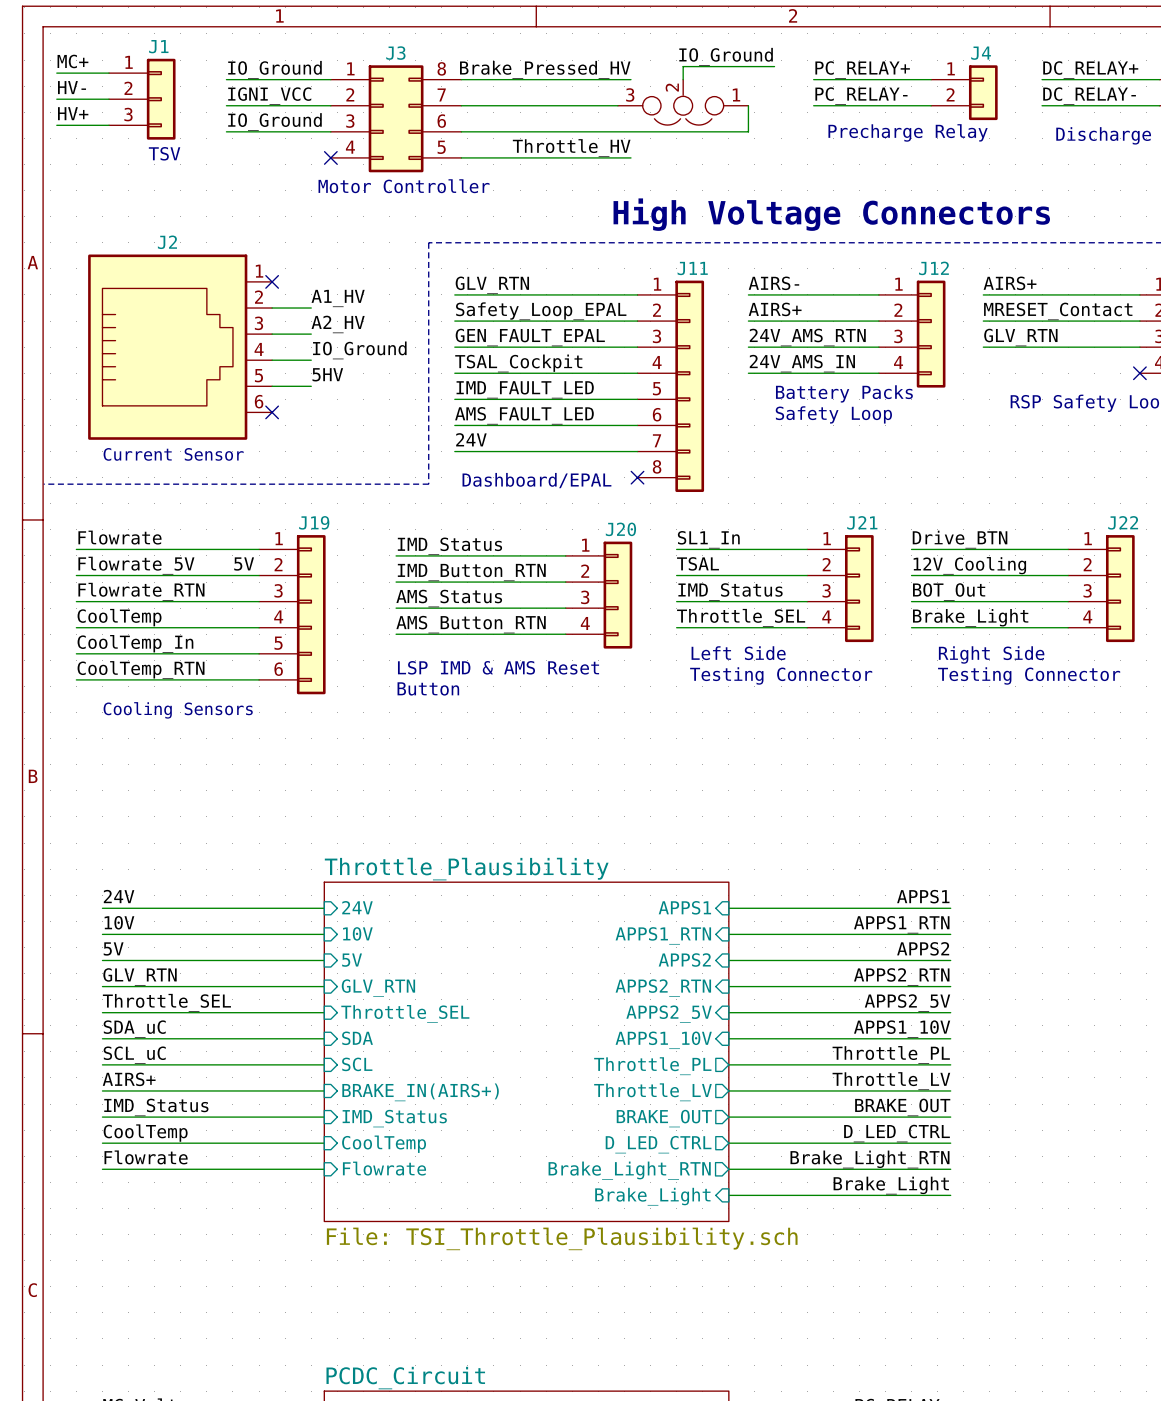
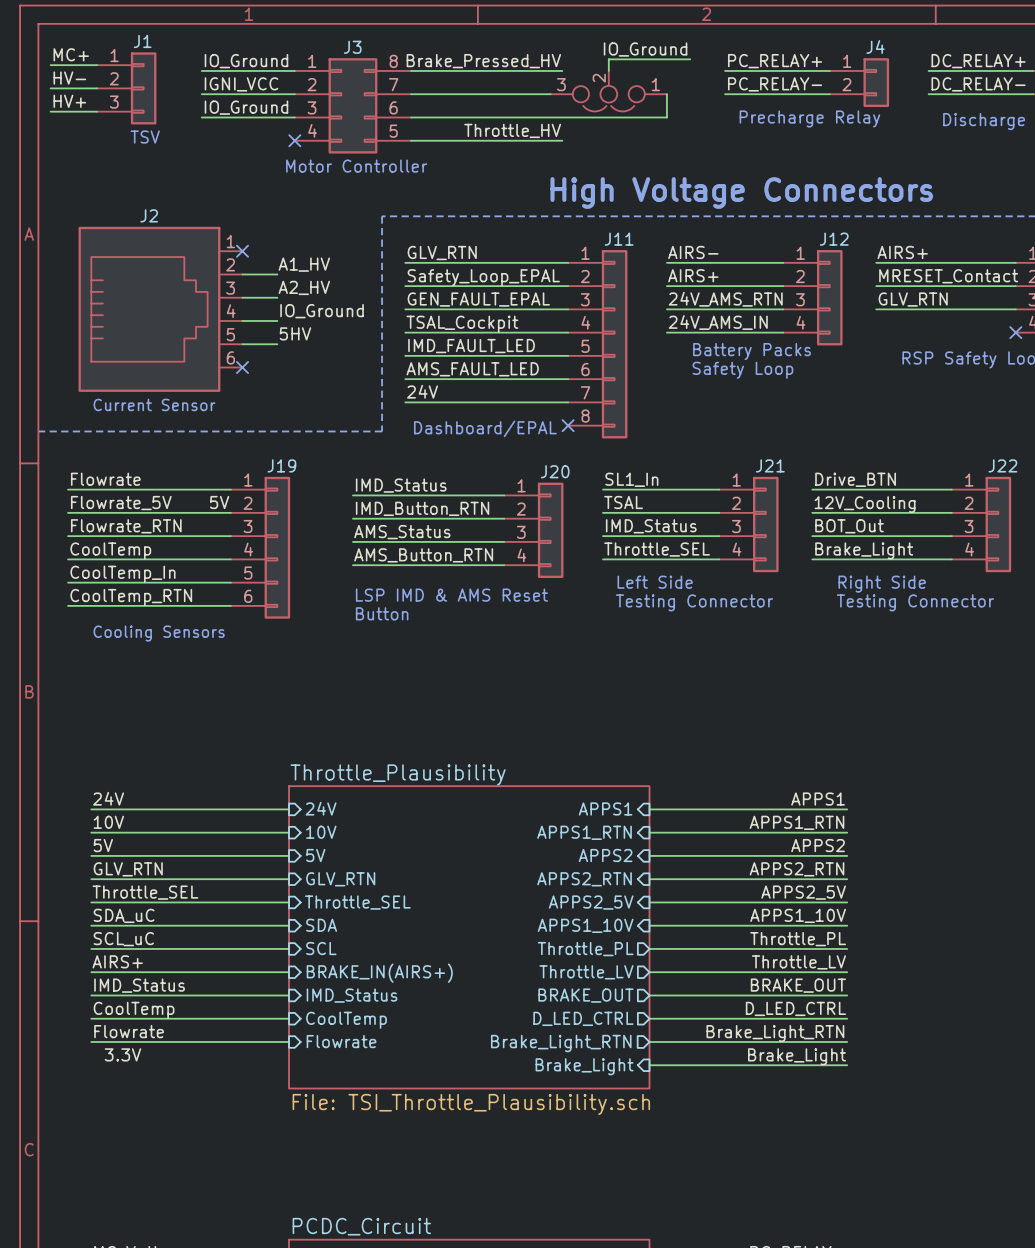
label: none -> 3.3V (122, 1054)

